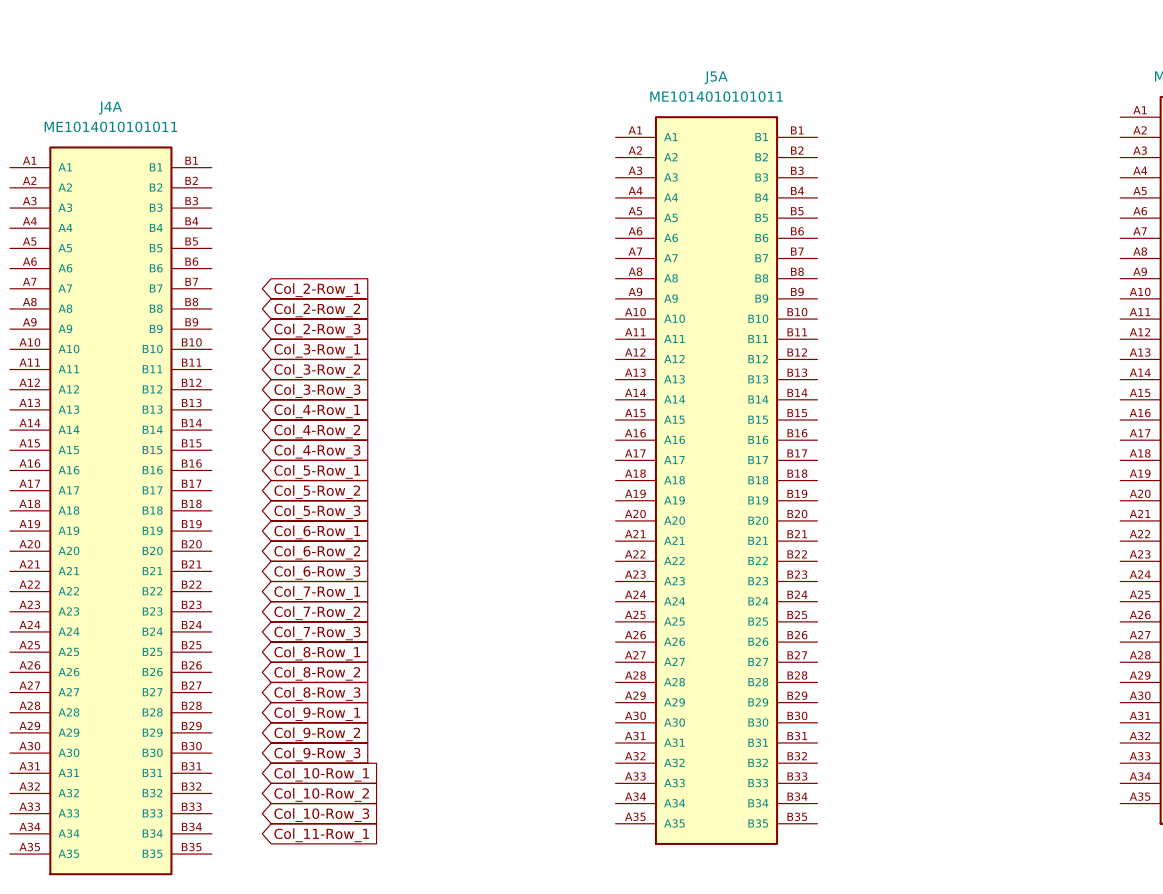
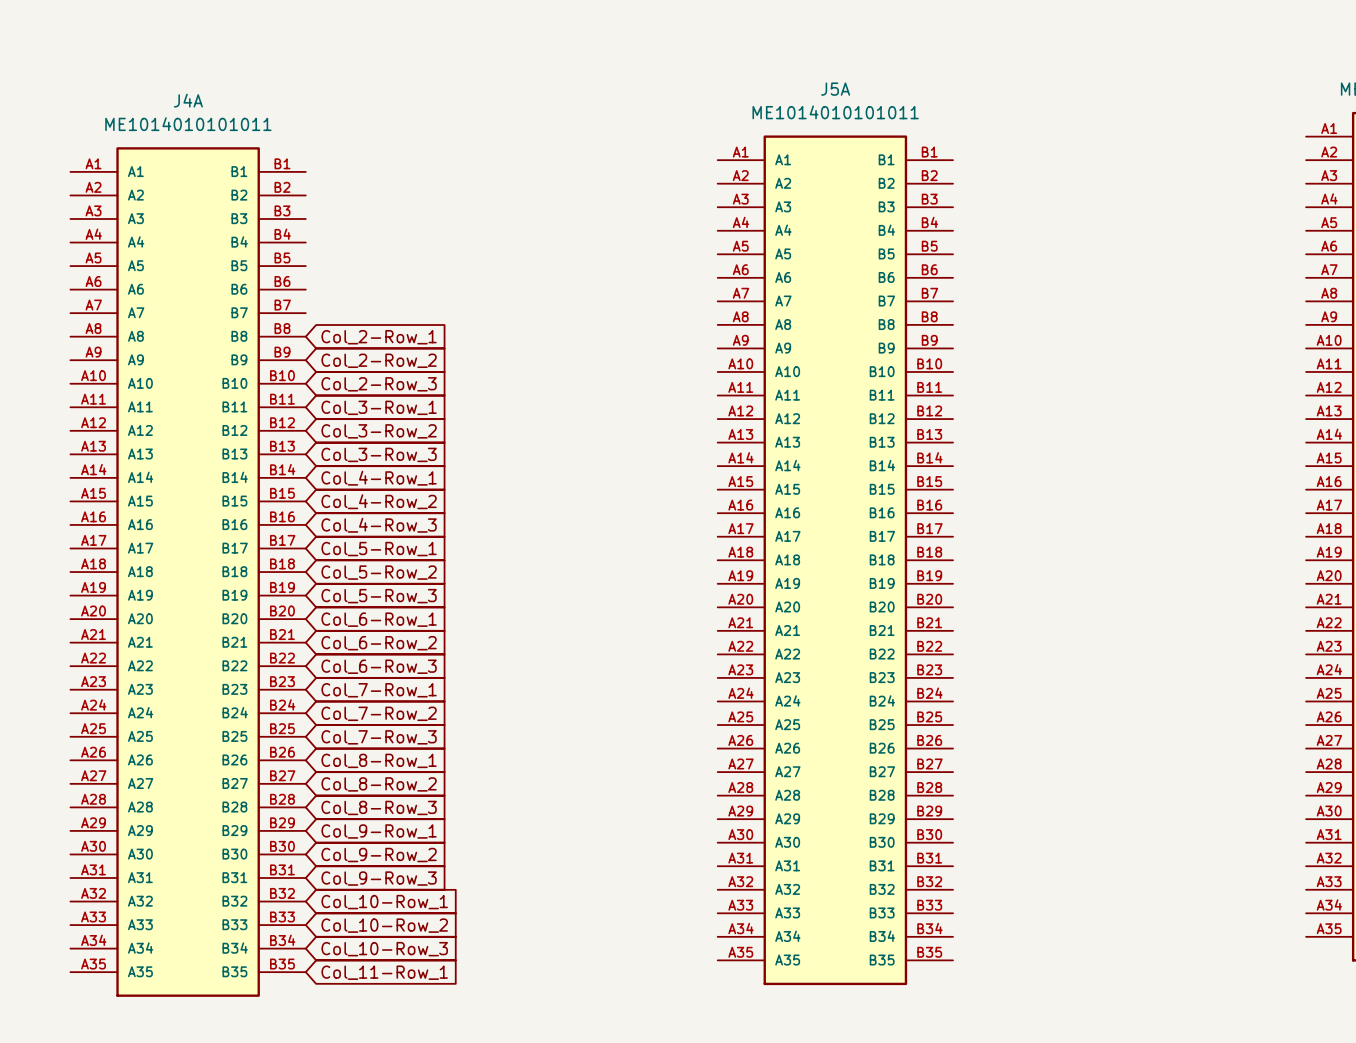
J4A position: (110, 510) -> (188, 572)

